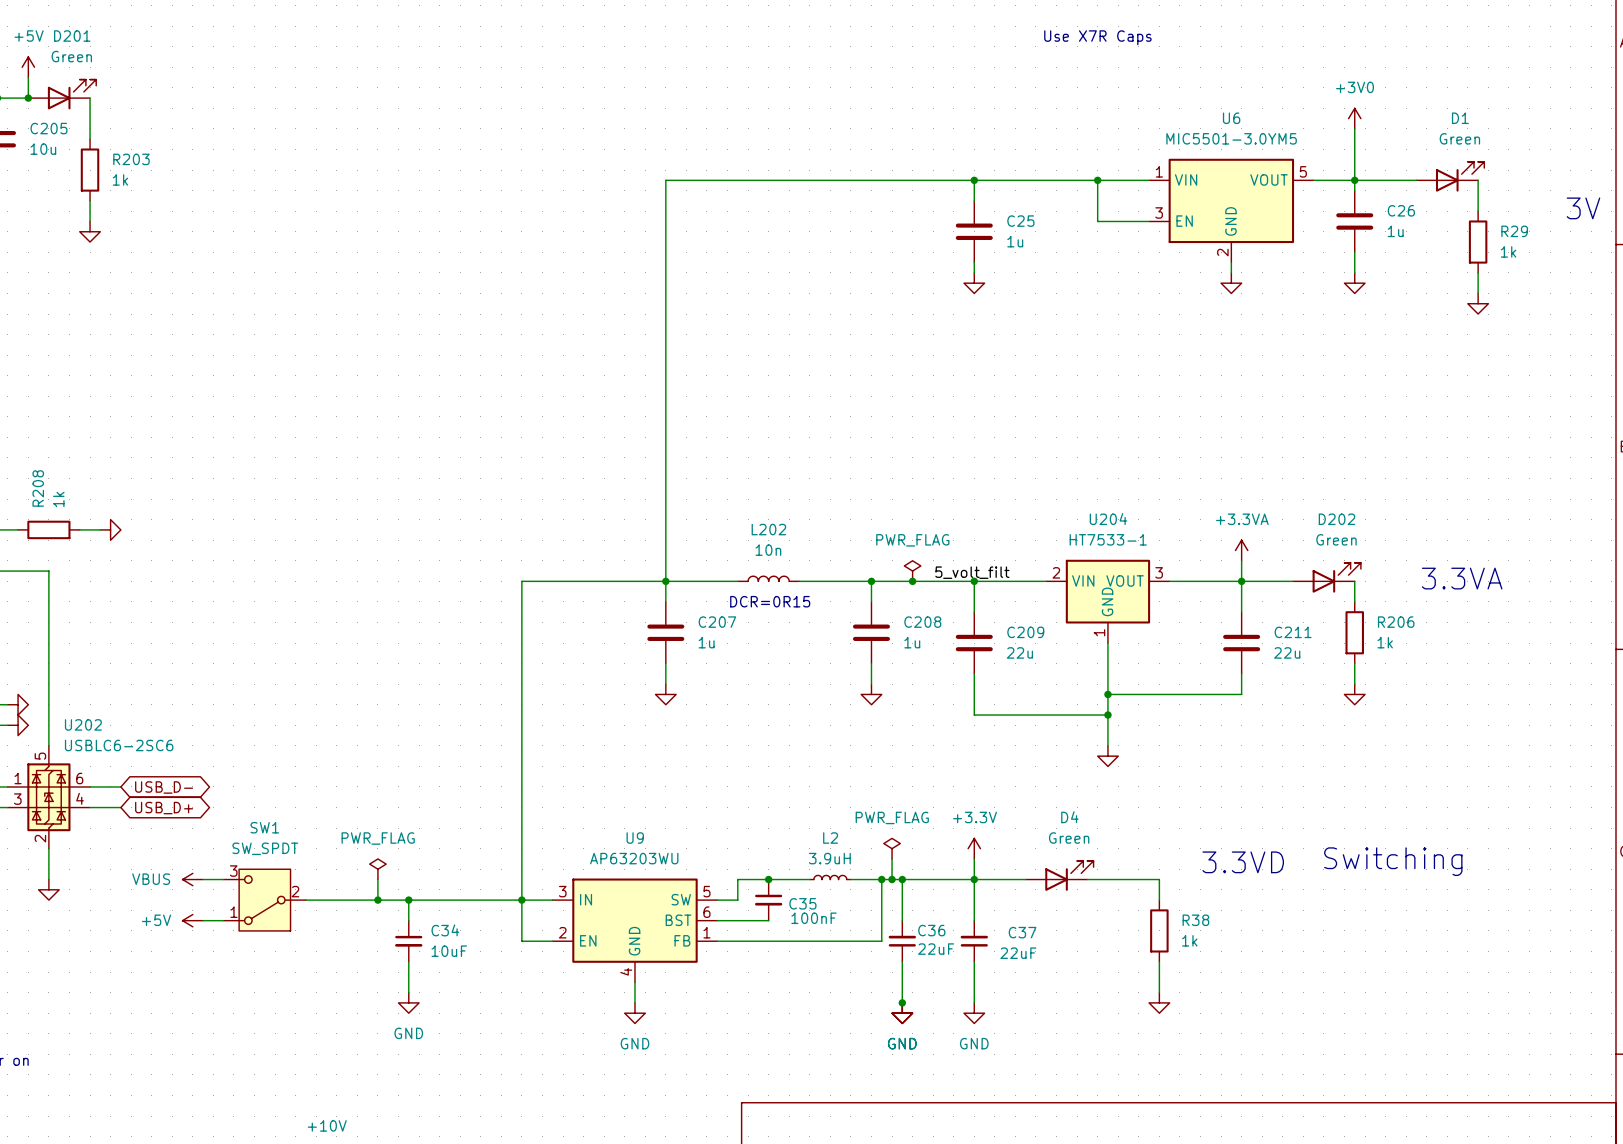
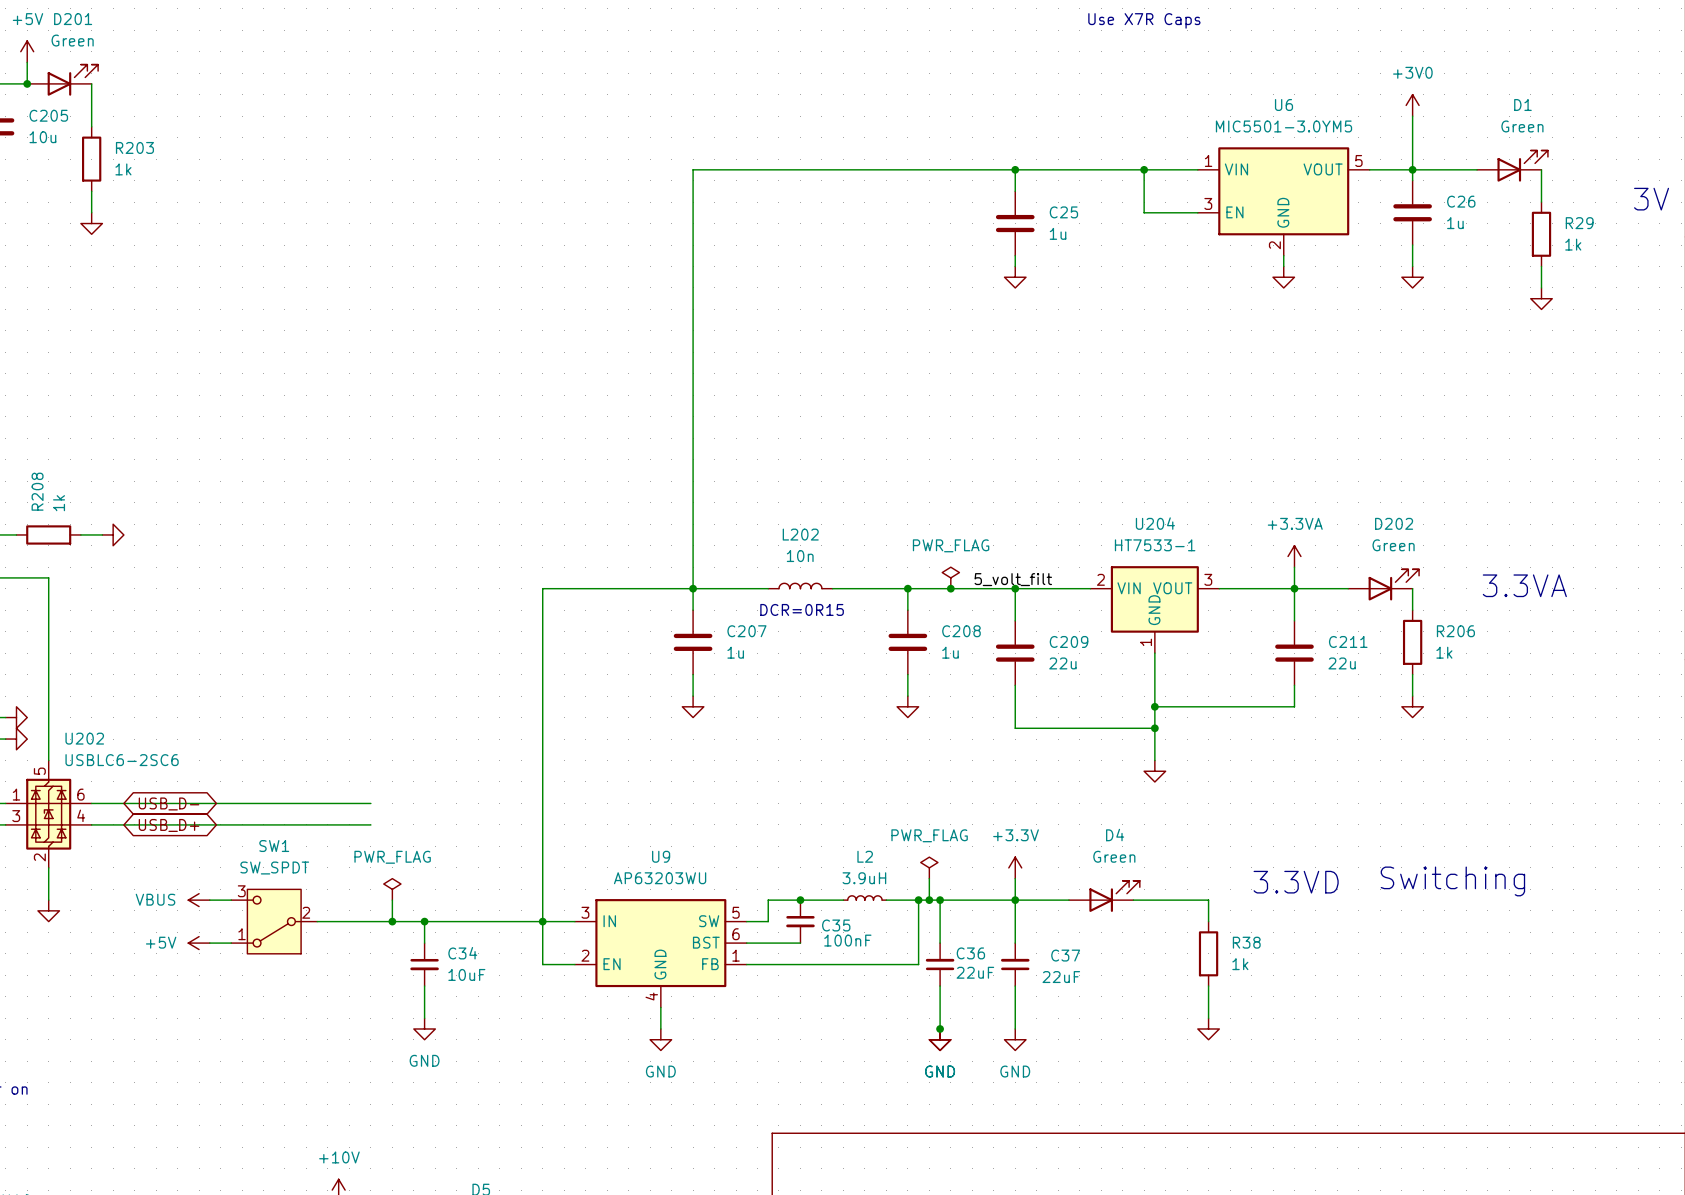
wire: none -> (123, 803) (370, 803)
wire: none -> (123, 824) (370, 824)

